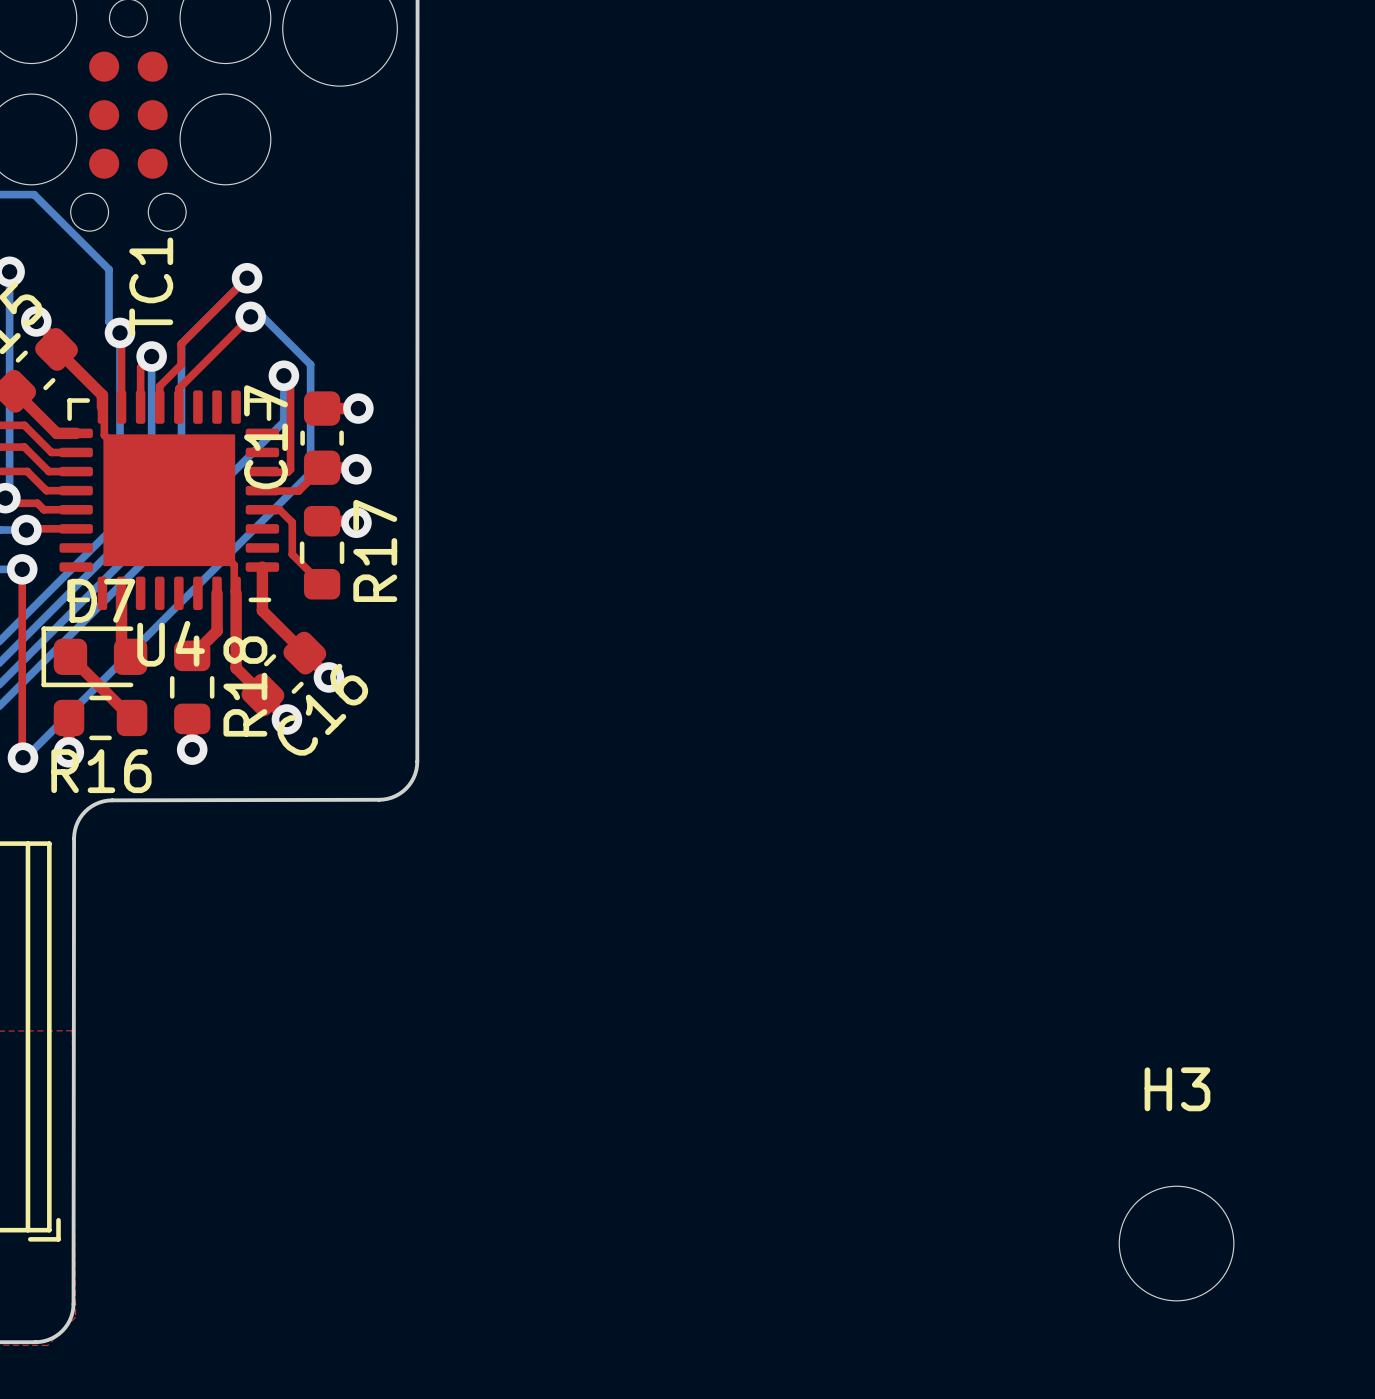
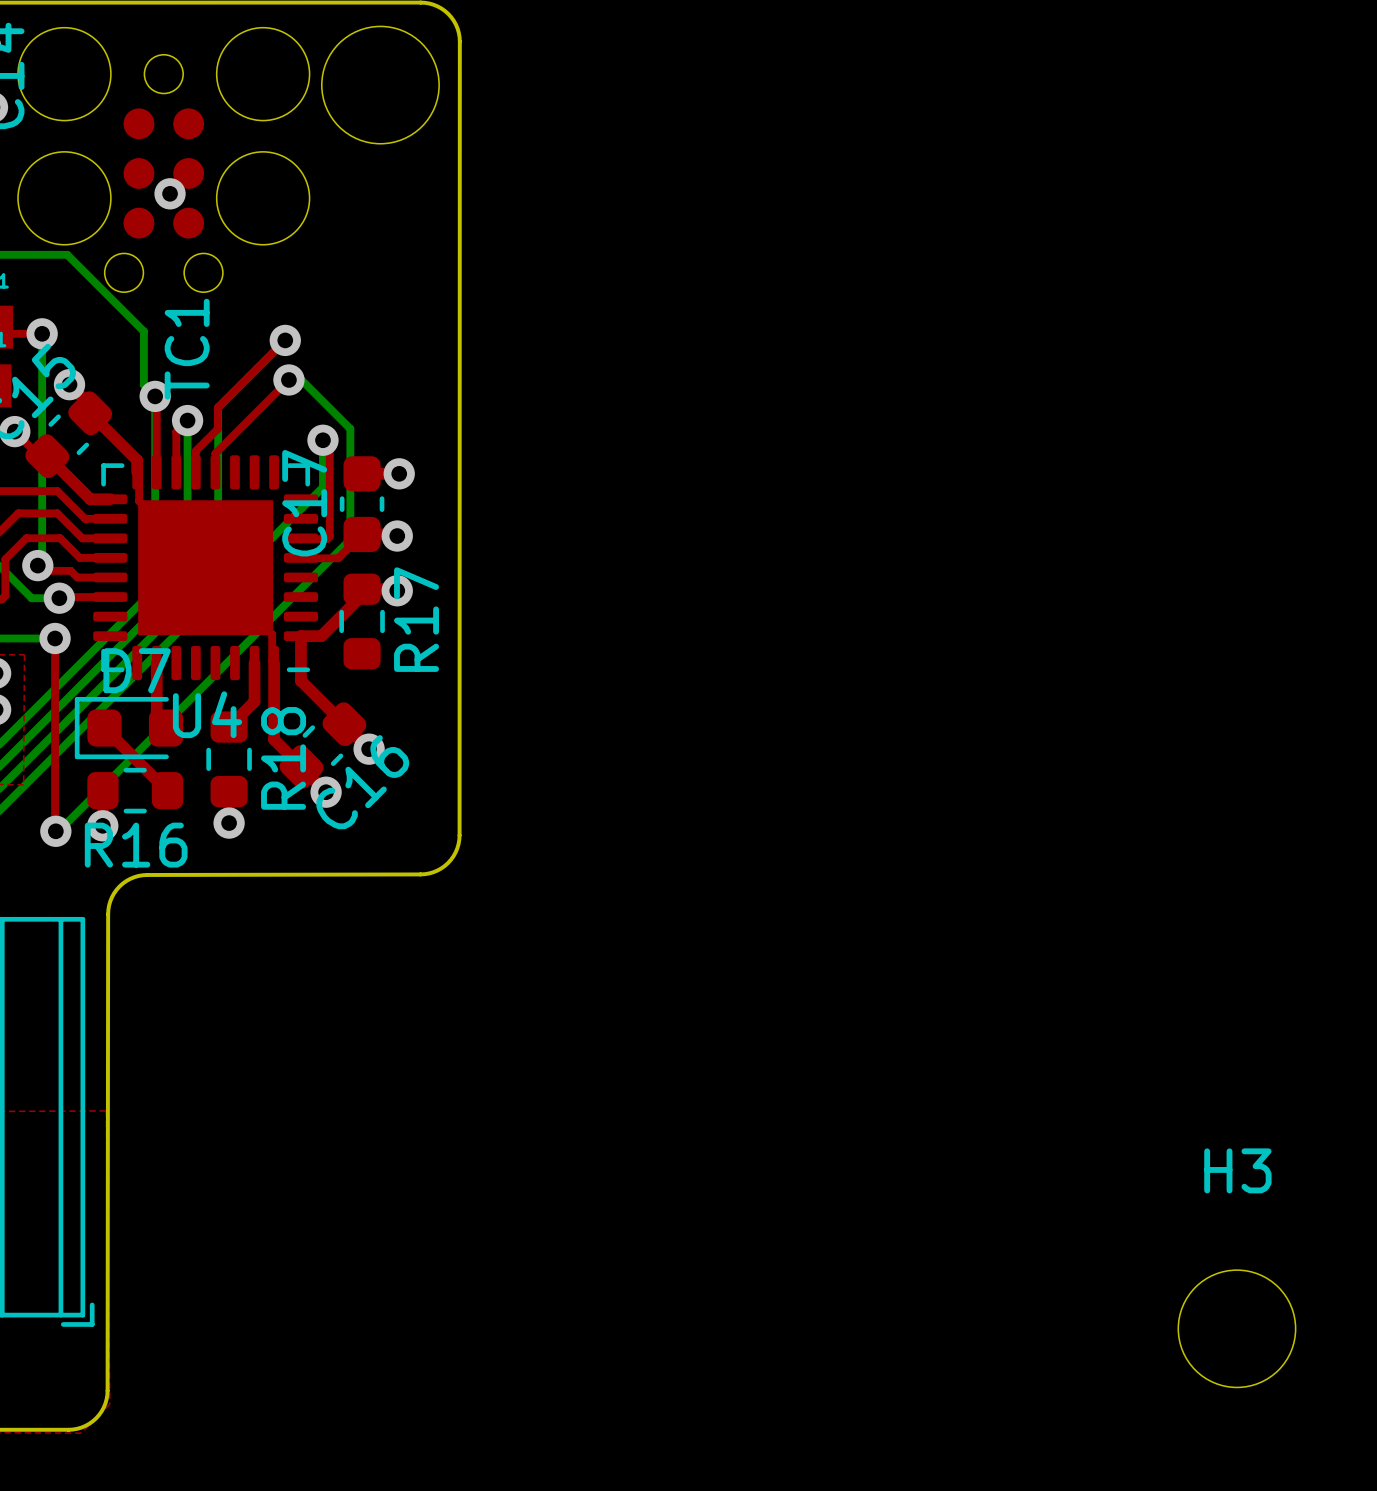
via: none -> (170, 193)
top track: (262, 509) (279, 509) (292, 522) (292, 554) (322, 584) -> none
top track: none -> (362, 595) (321, 636) (300, 636)

